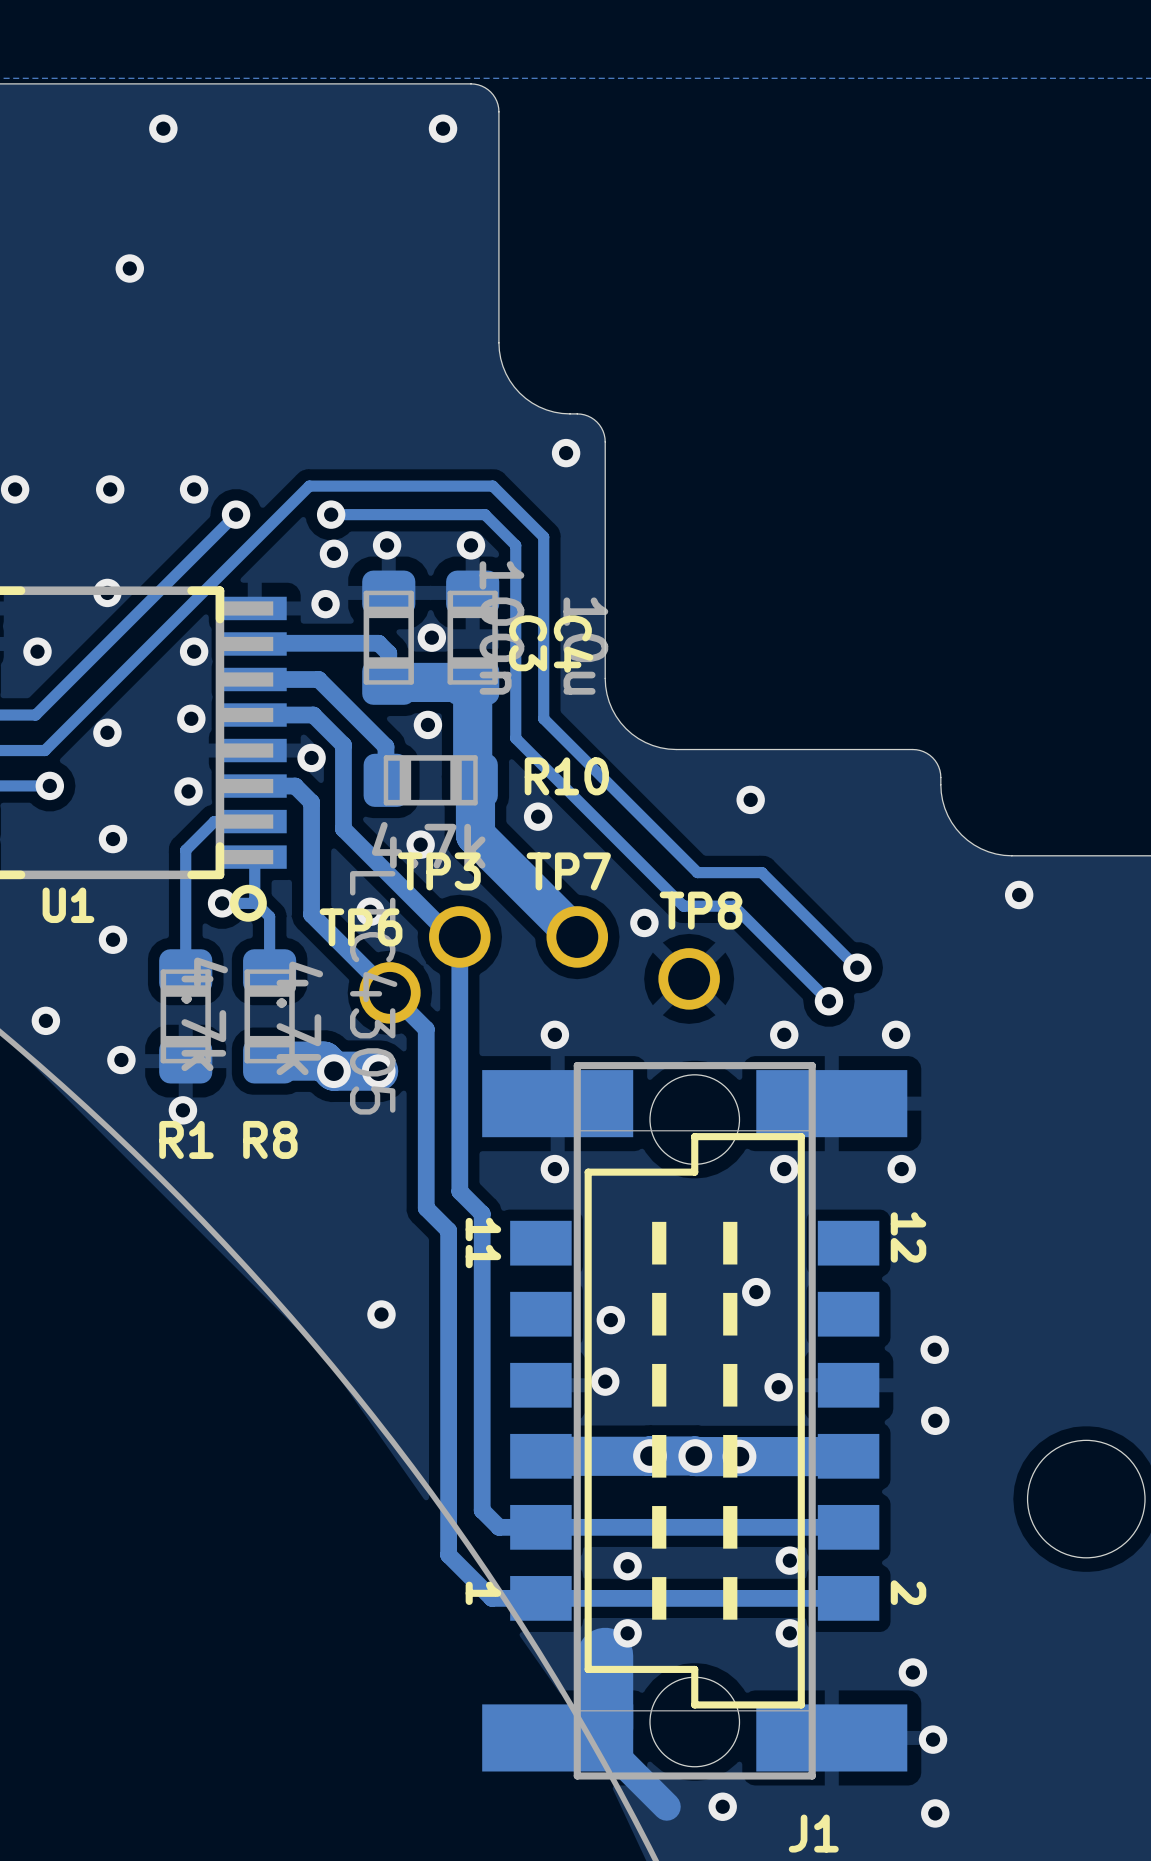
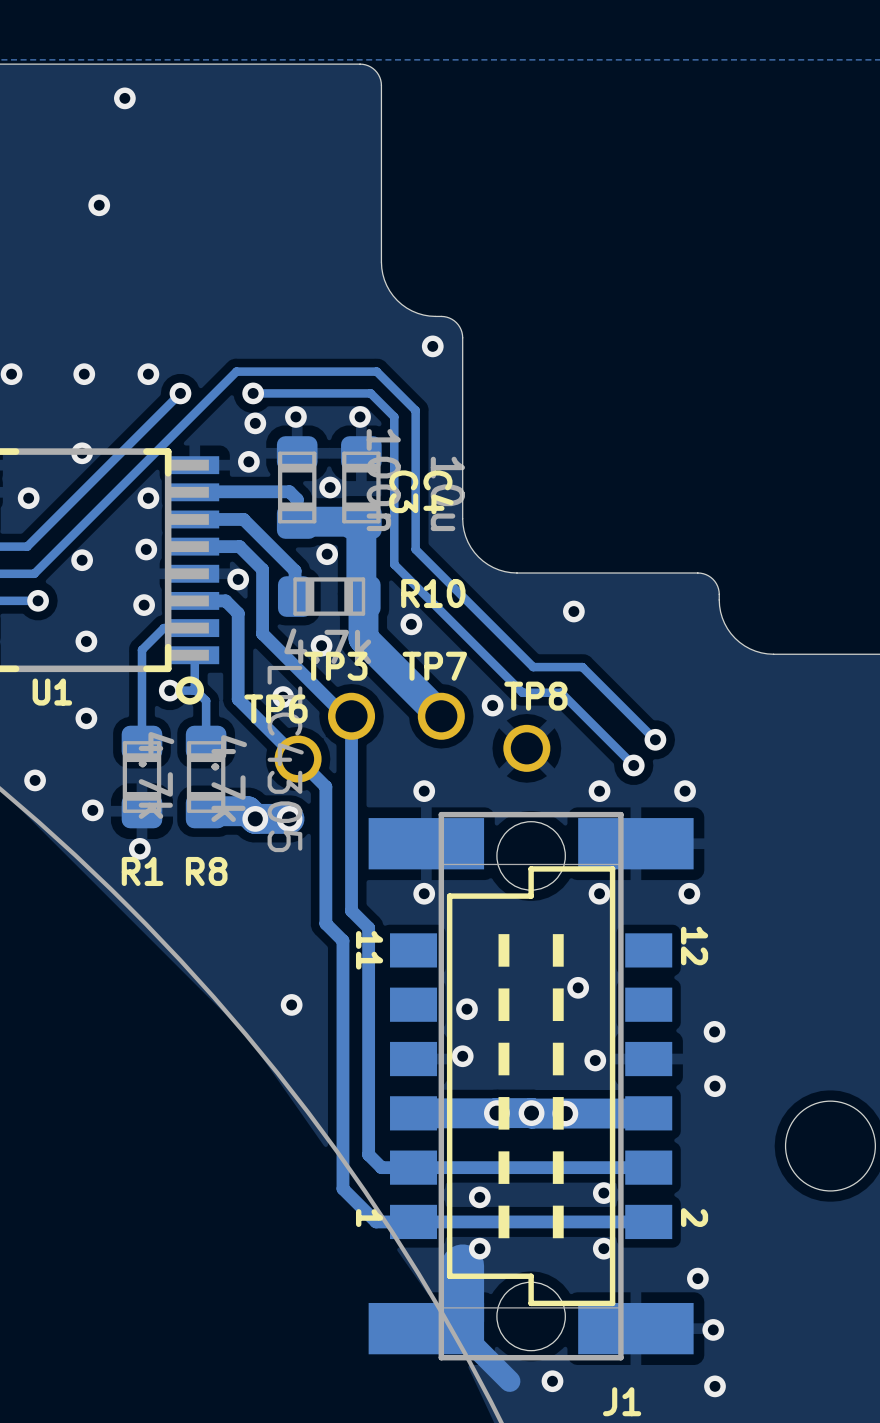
via: (443, 128) -> none
via: (1019, 894) -> none

